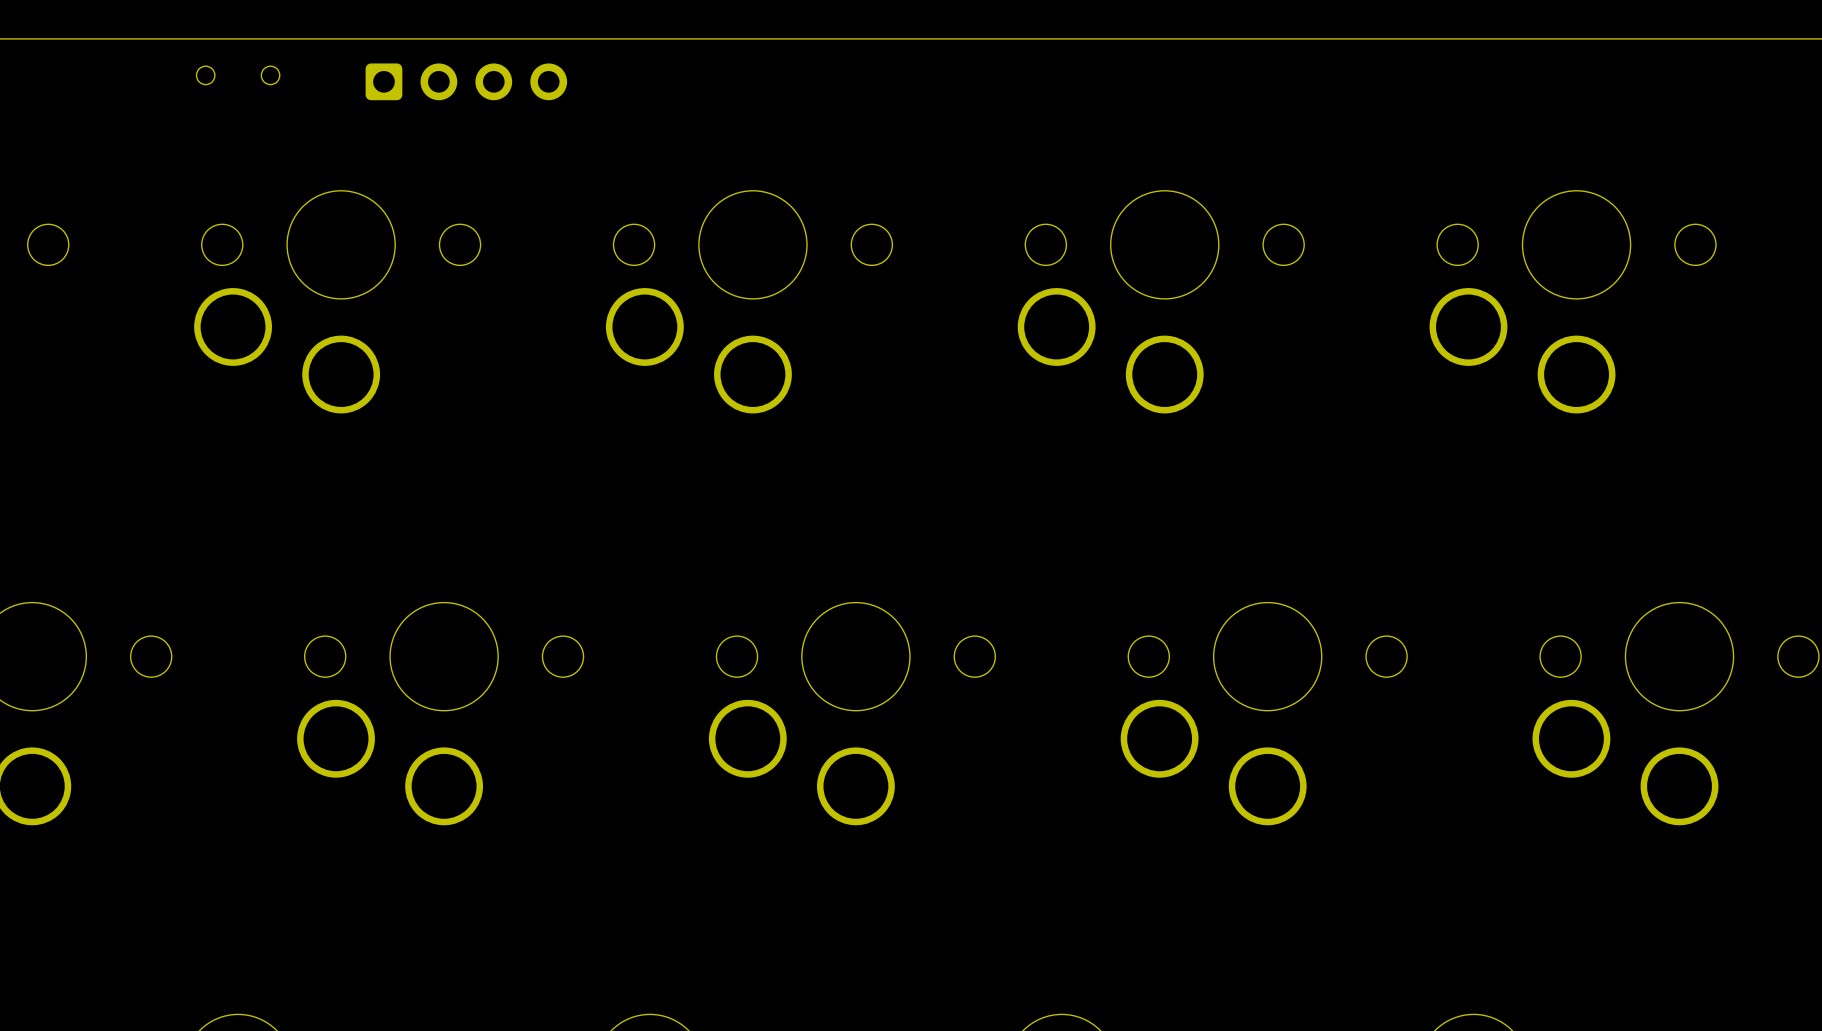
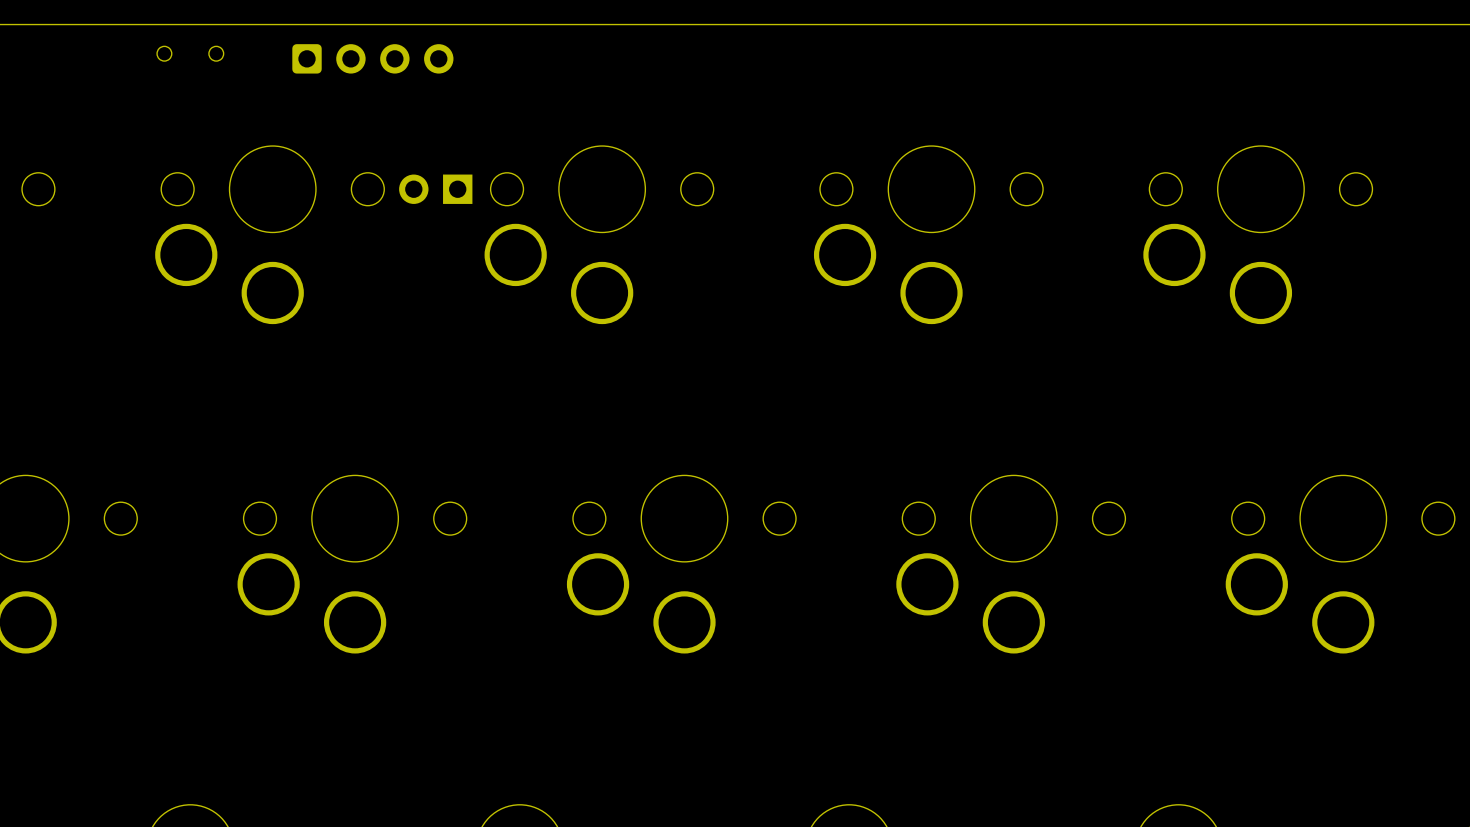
part: none -> (435, 189)

